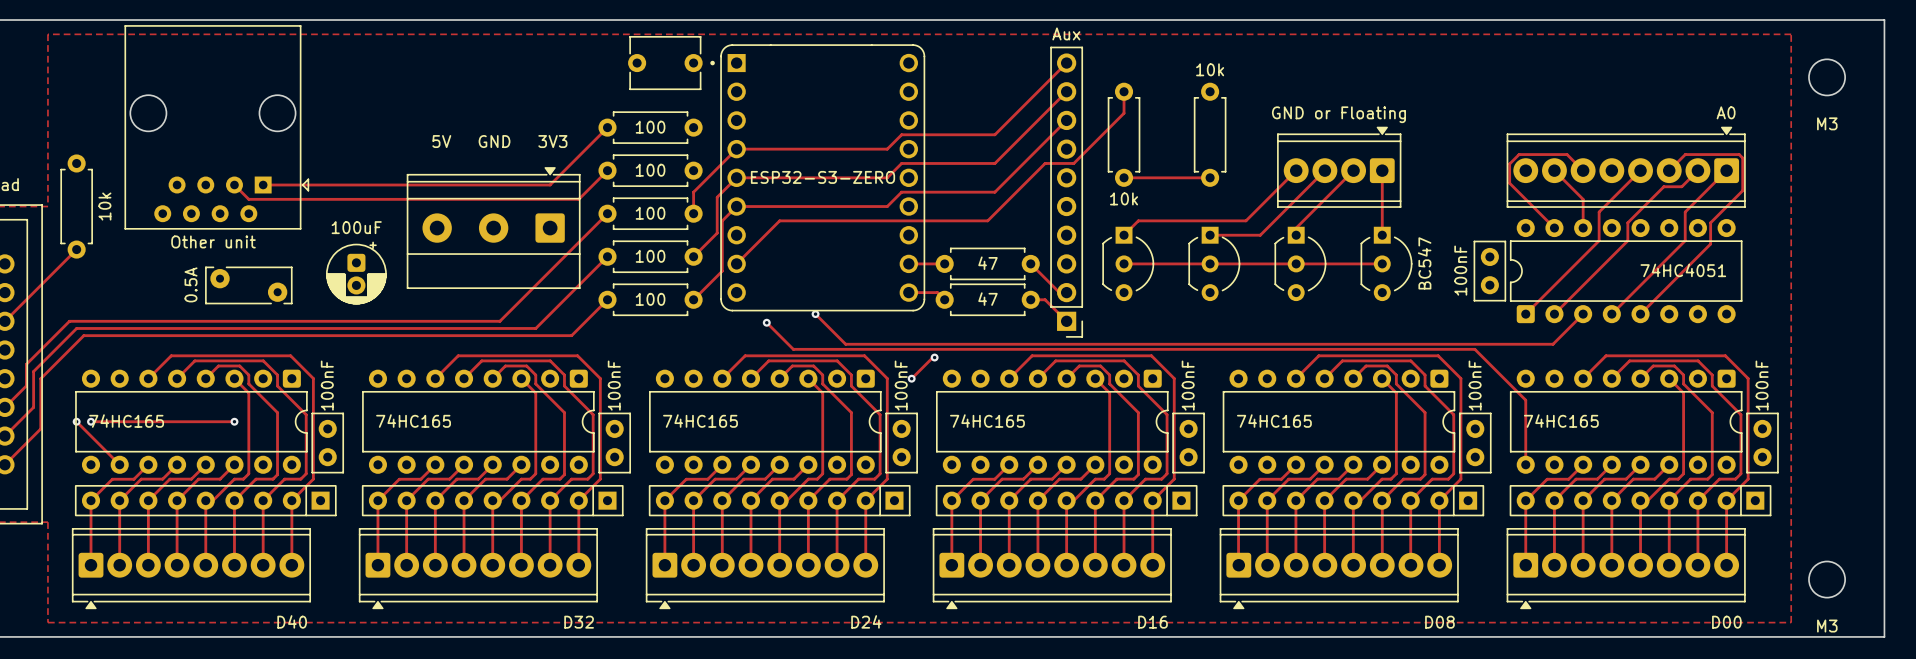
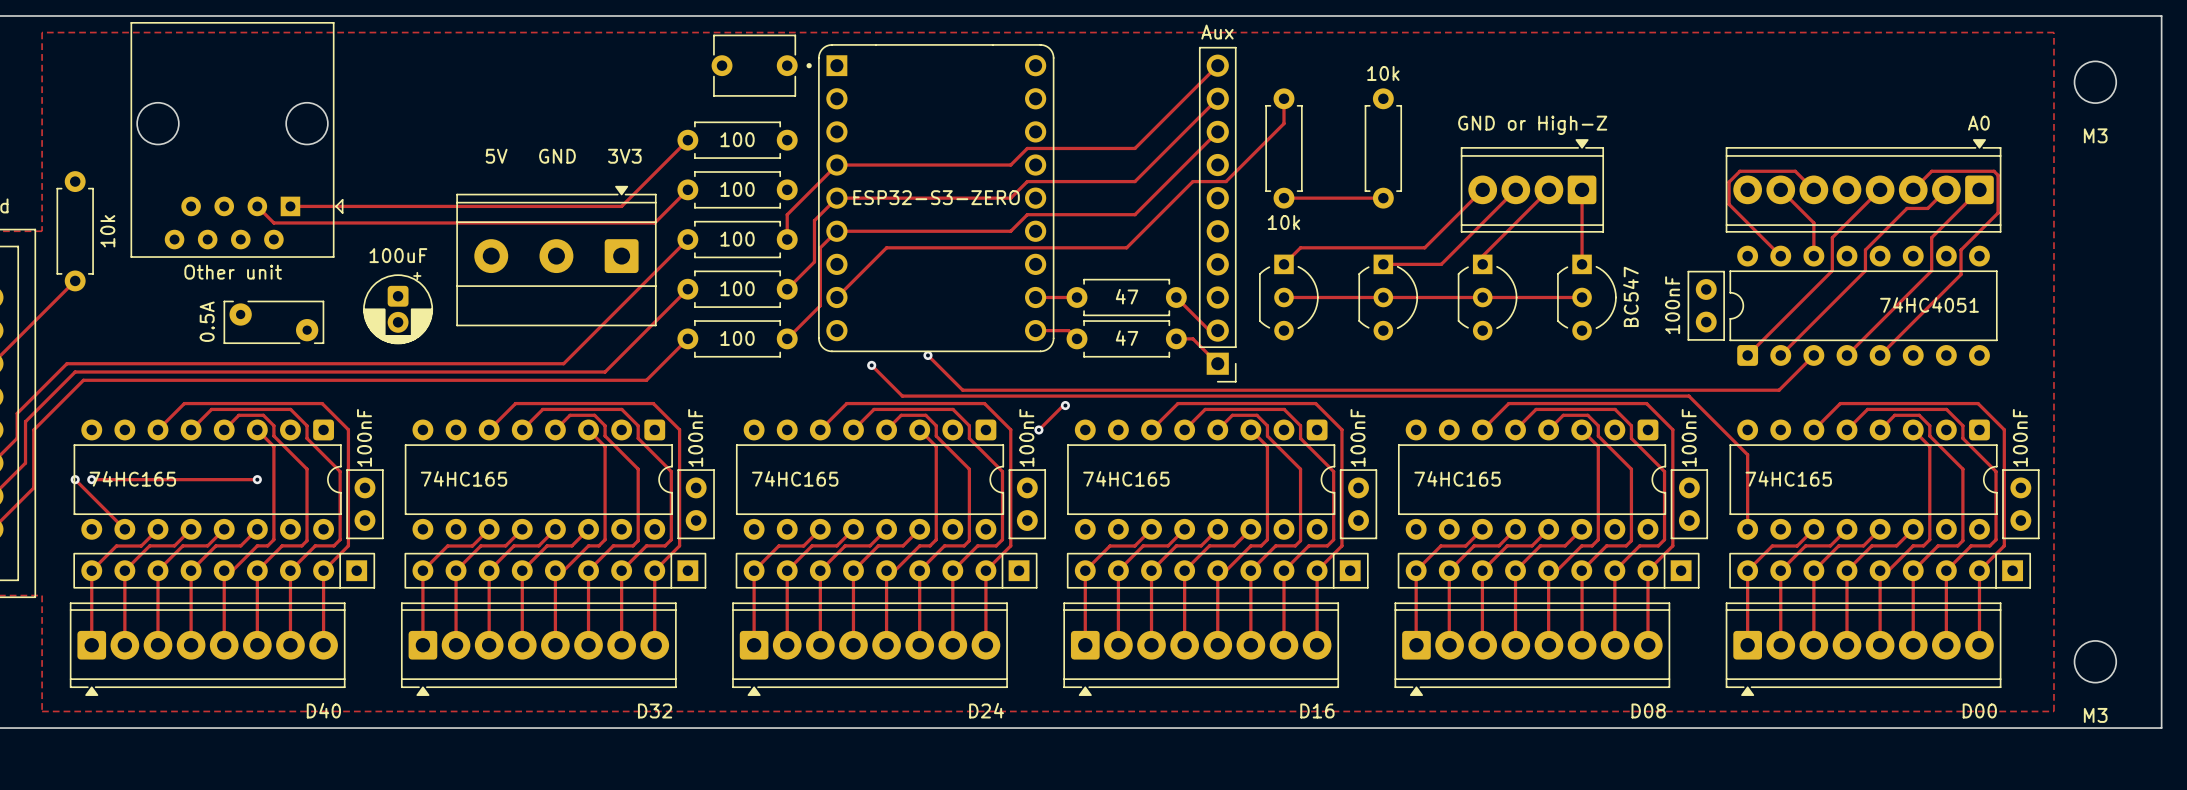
text: GND or Floating (1338, 114) -> GND or High-Z (1532, 125)

